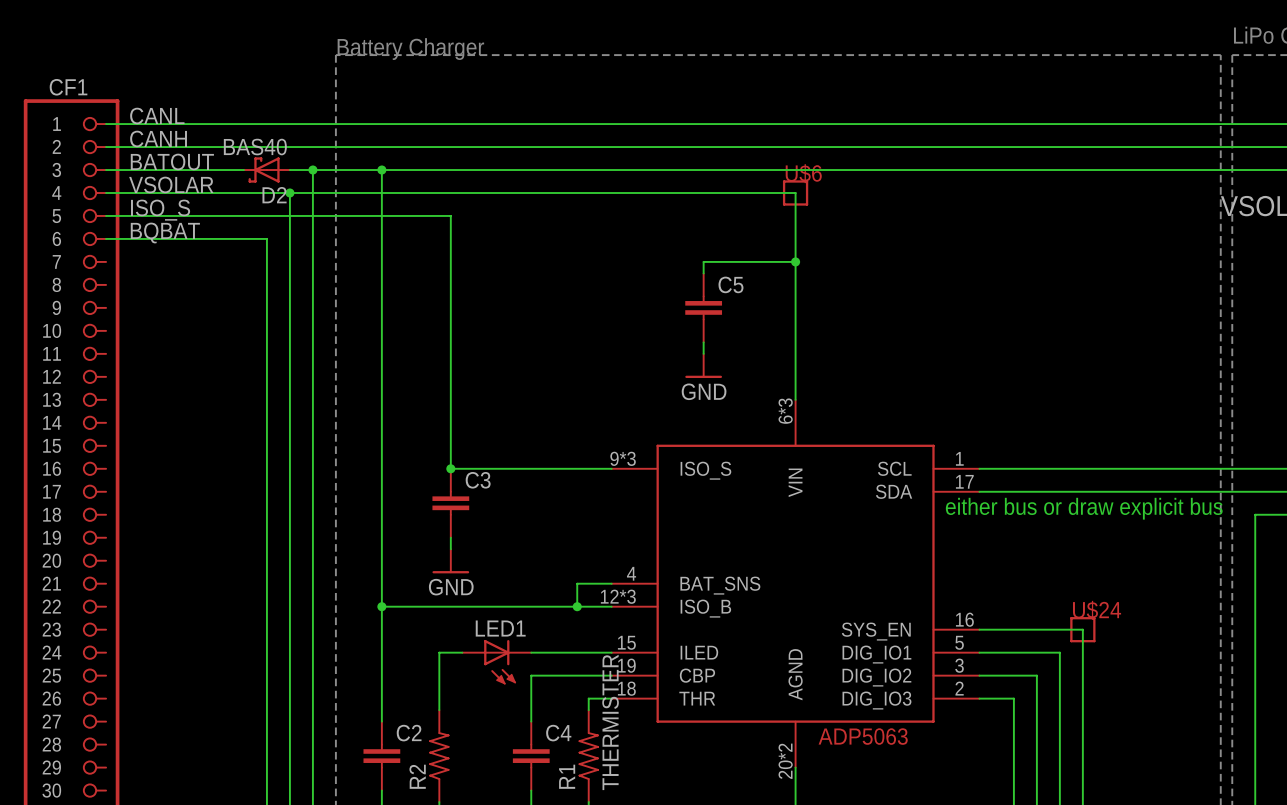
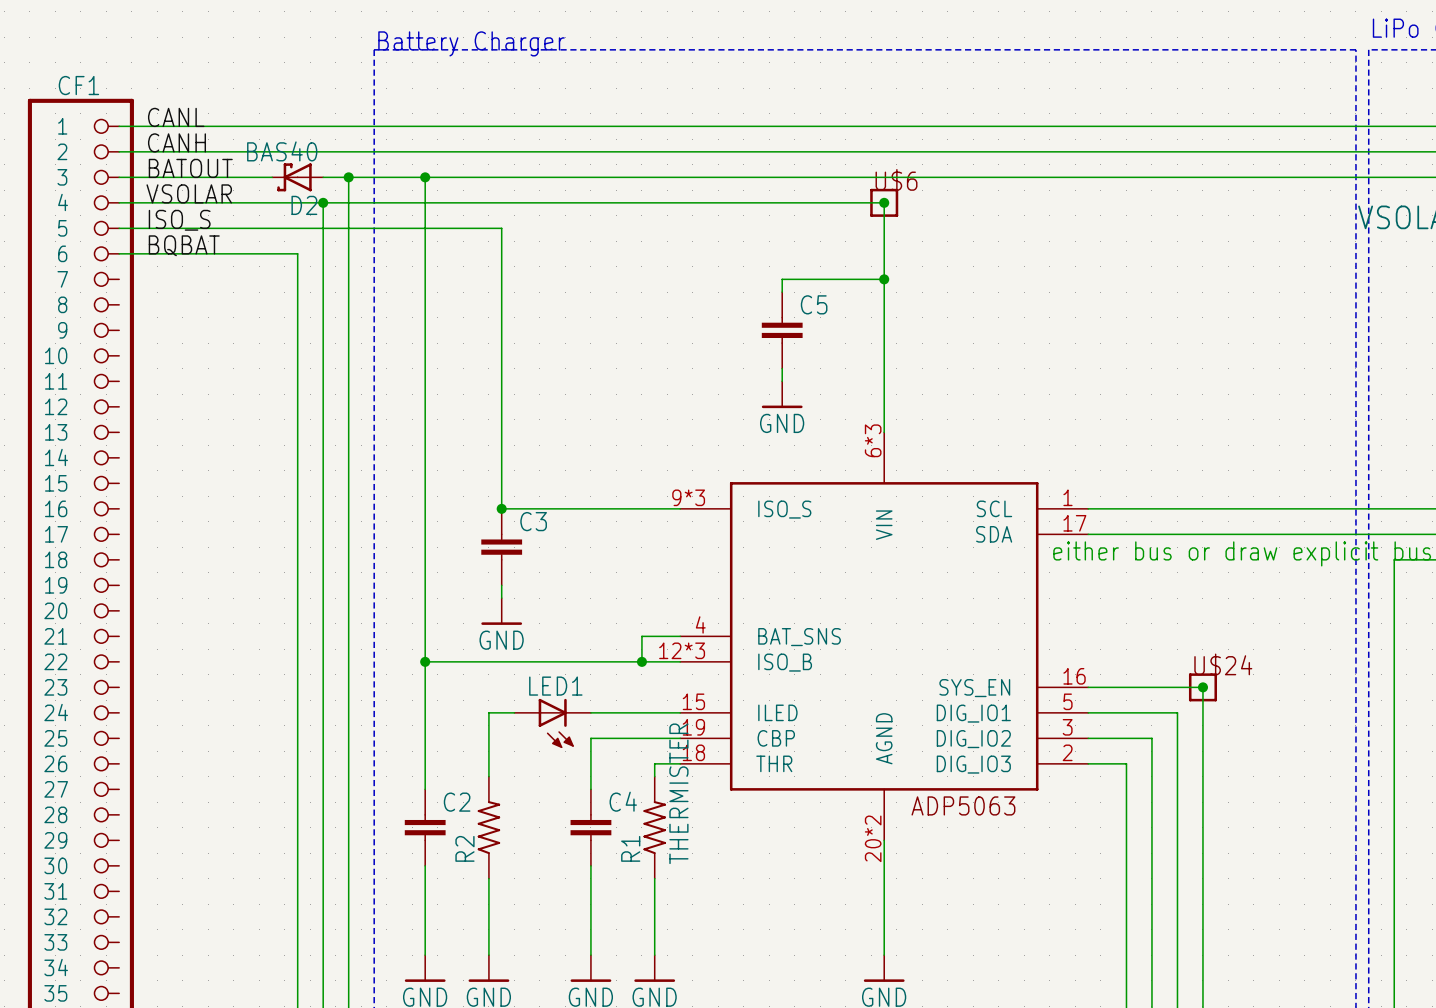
junction: none -> (884, 202)
junction: none -> (1202, 687)

